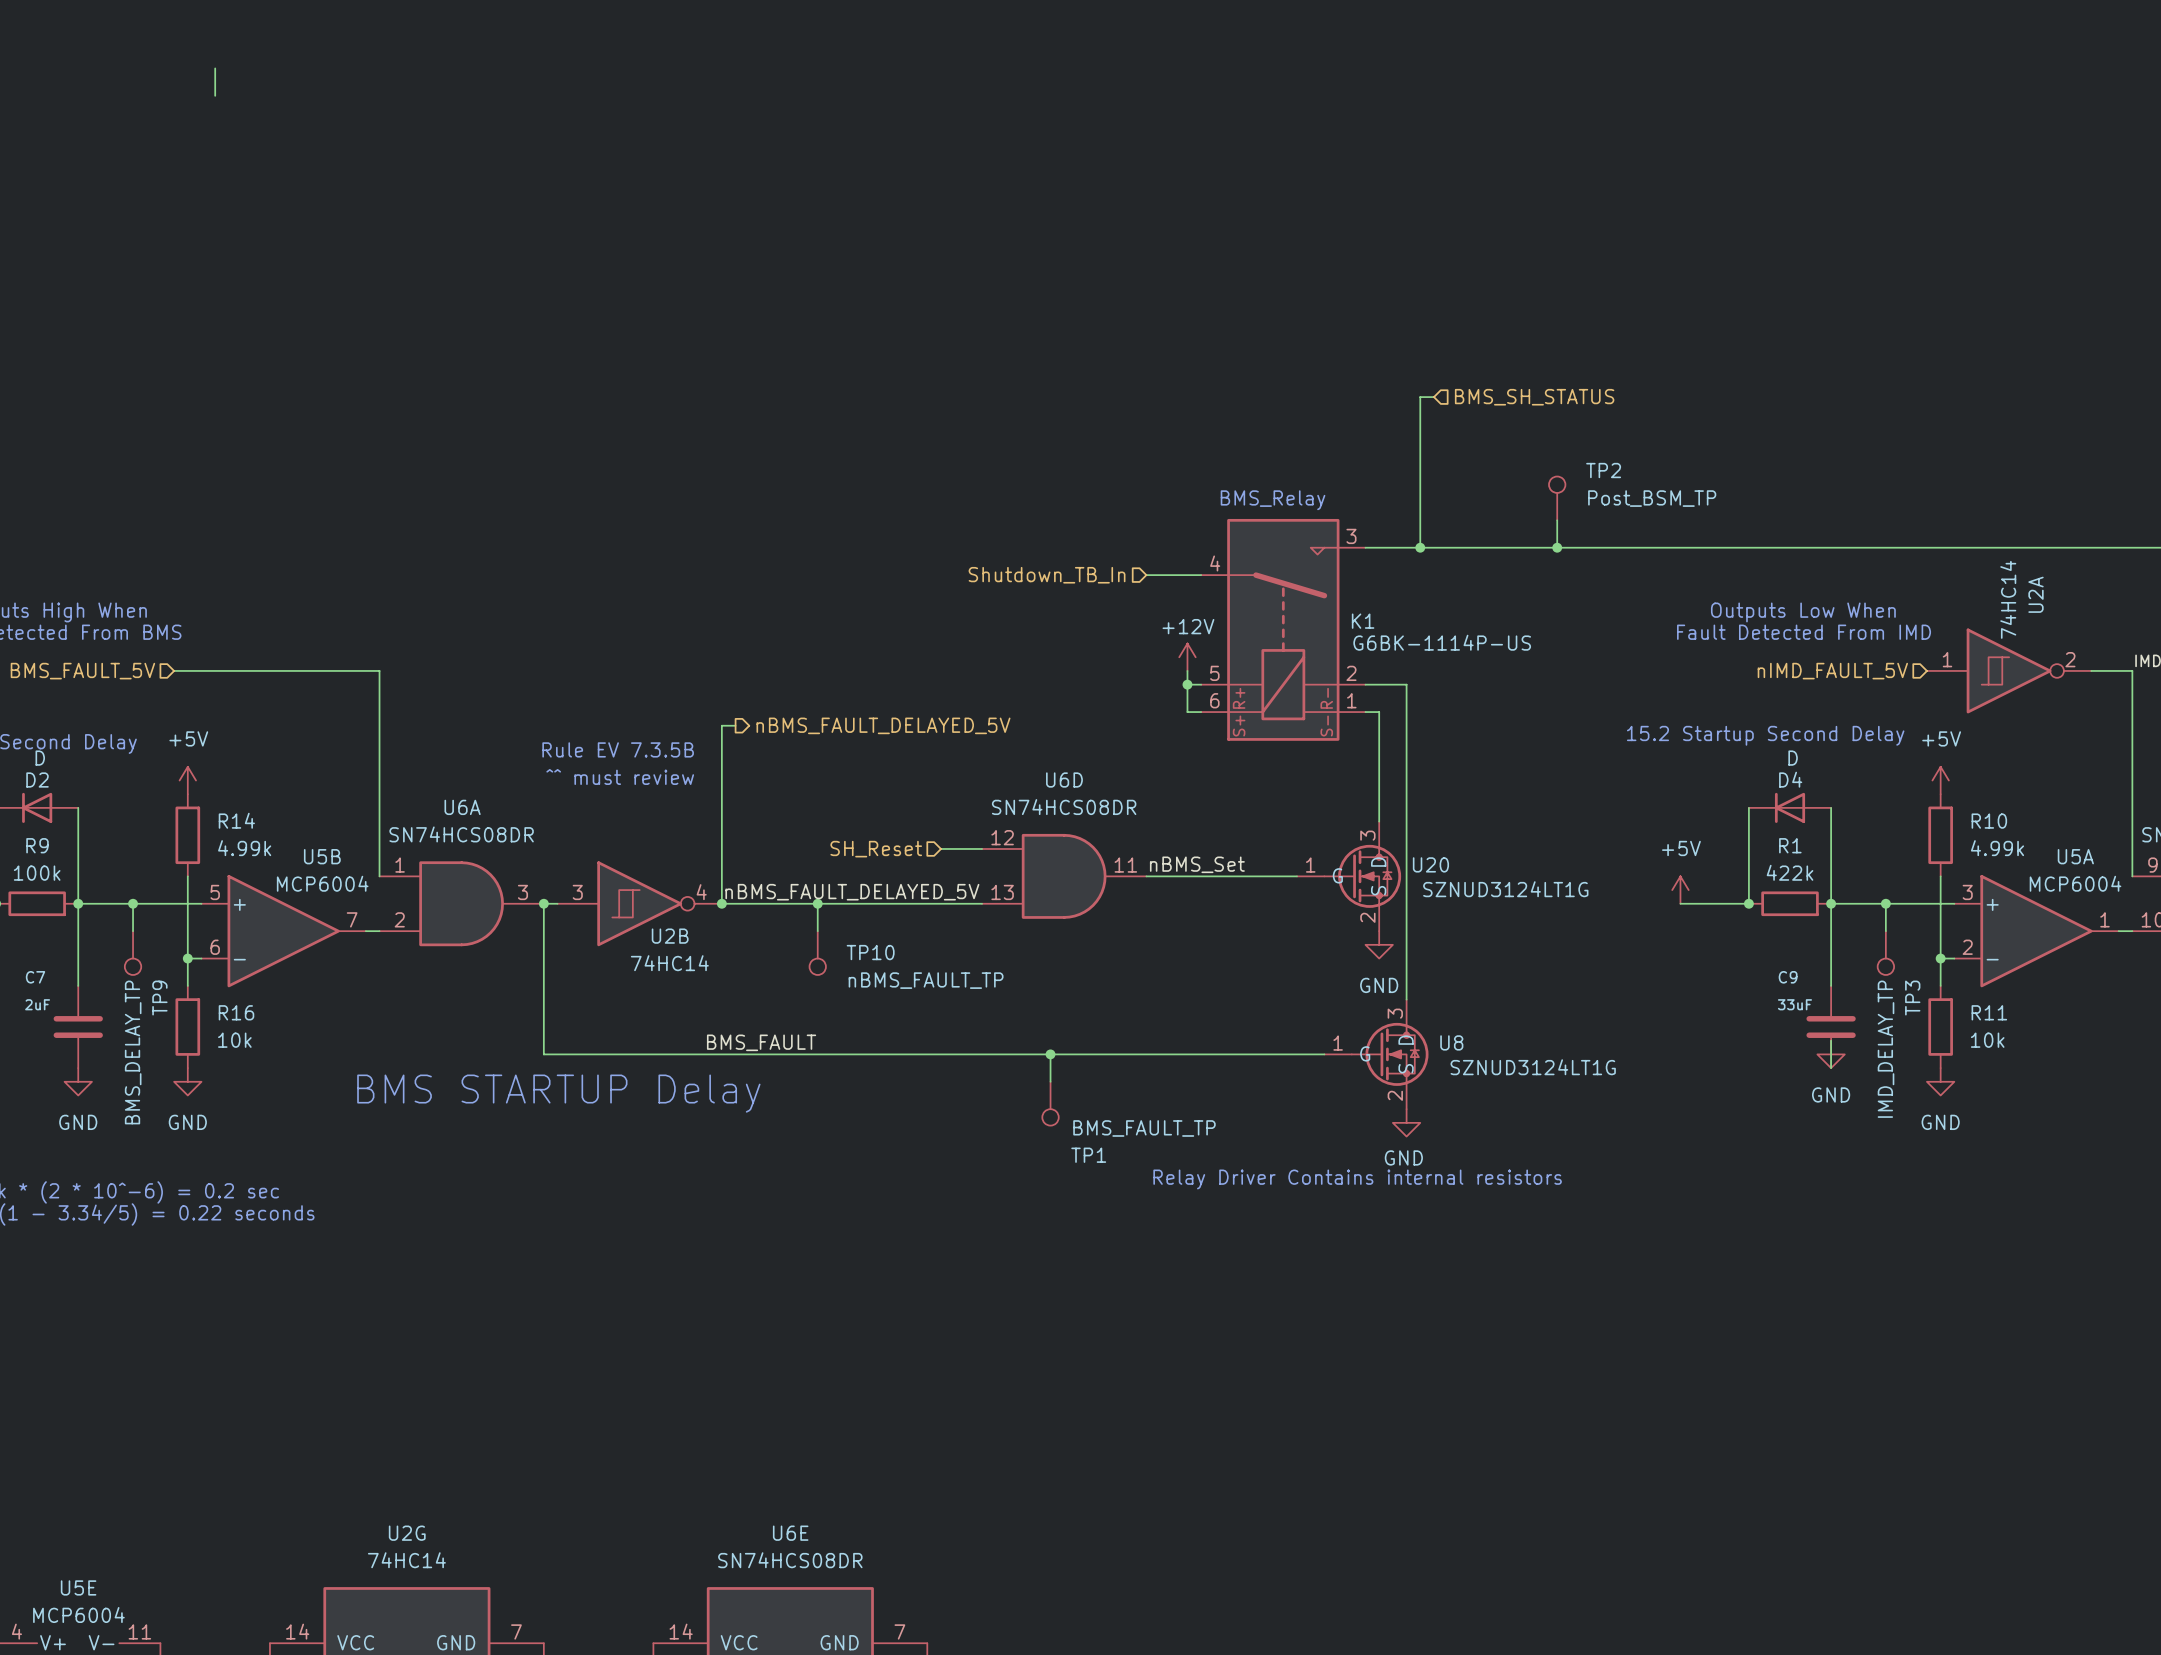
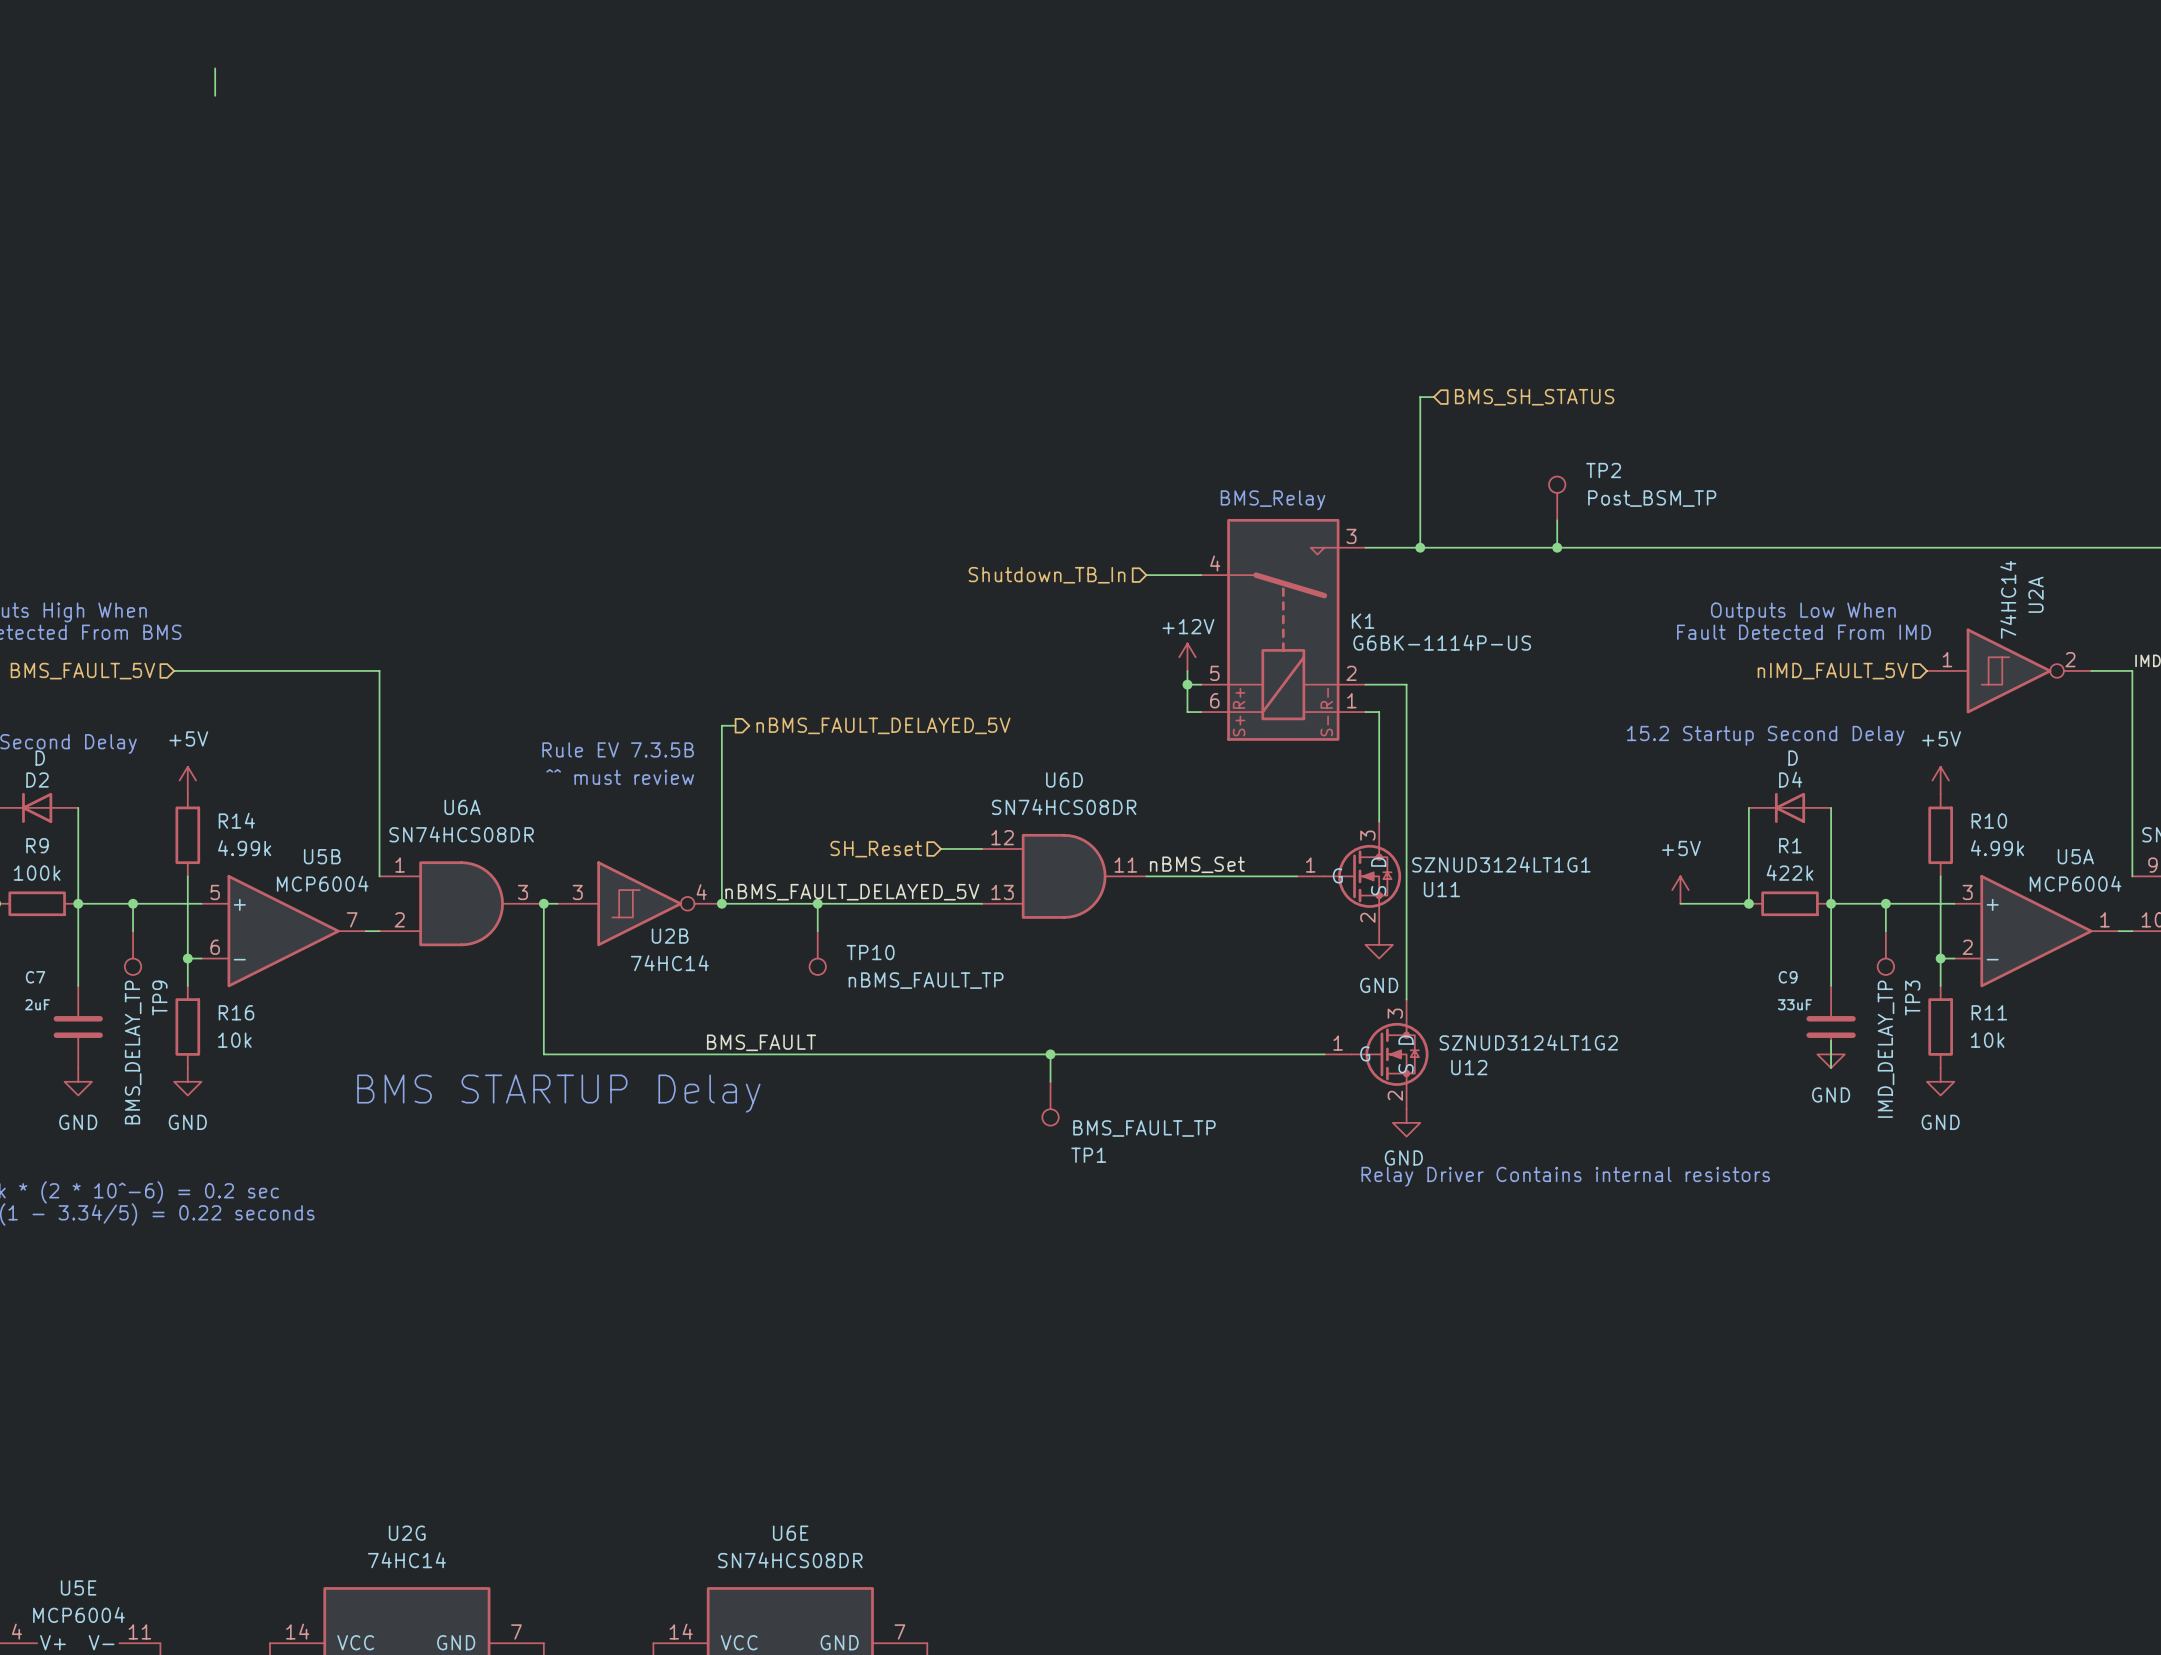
U20 name: U20 (1430, 864) -> SZNUD3124LT1G1 (1501, 864)
U20 value: SZNUD3124LT1G (1505, 889) -> U11 (1441, 889)
U8 name: U8 (1451, 1042) -> SZNUD3124LT1G2 (1528, 1042)
U8 value: SZNUD3124LT1G (1533, 1067) -> U12 (1469, 1067)
text position: Relay Driver Contains internal resistors (1357, 1179) -> Relay Driver Contains internal resistors (1565, 1176)

